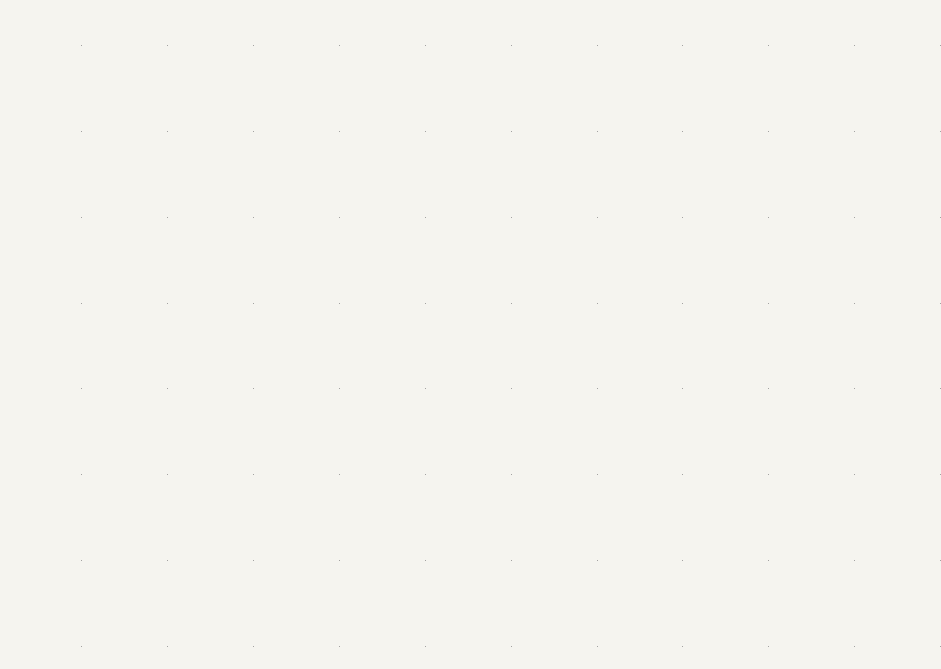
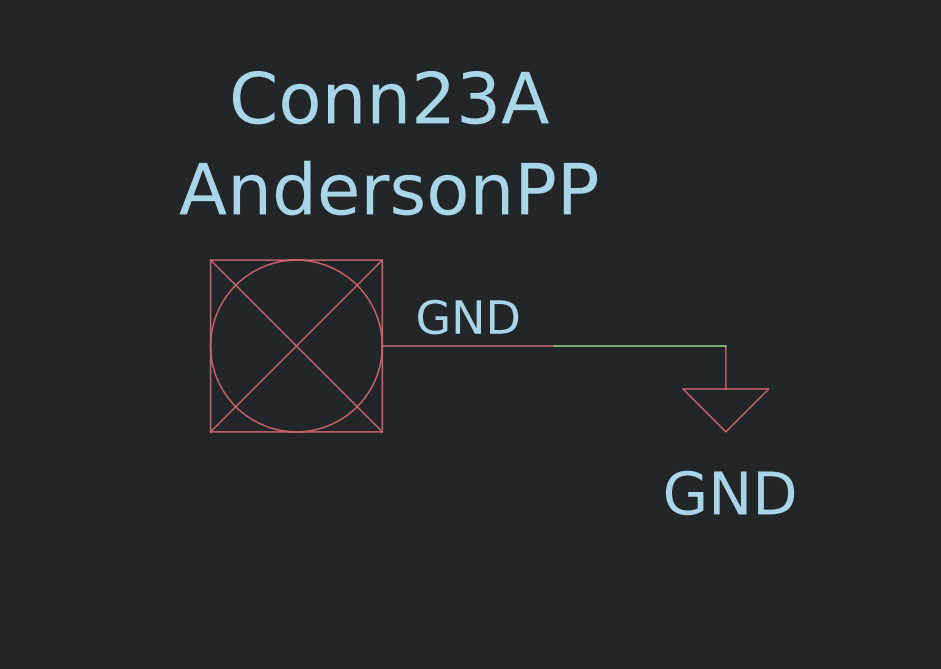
Conn23A: none -> AndersonPP (382, 345)
wire: none -> (554, 345) (725, 345)
power symbol: none -> GND (725, 388)

